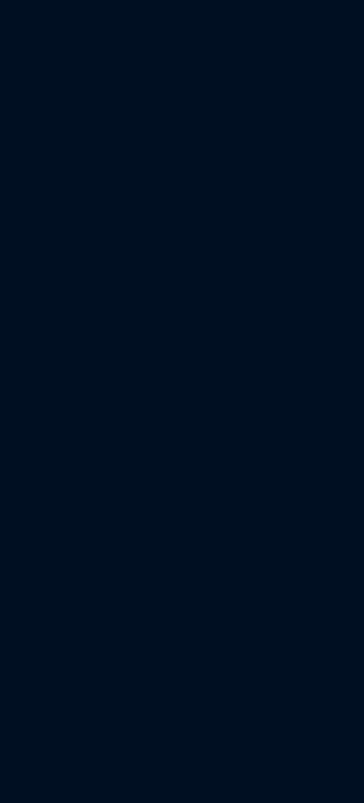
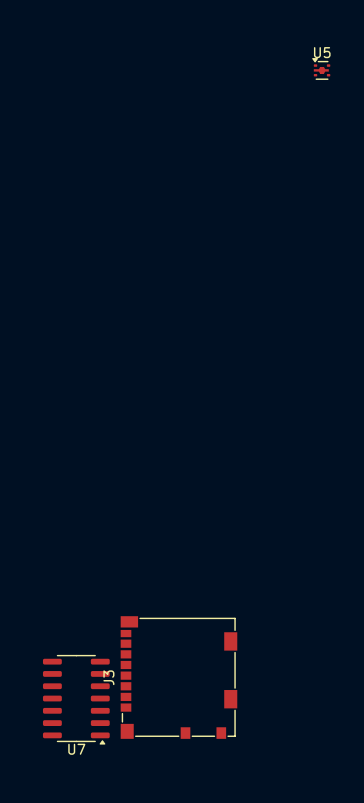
U5: none -> (321, 68)
J3: none -> (178, 677)
U7: none -> (76, 699)

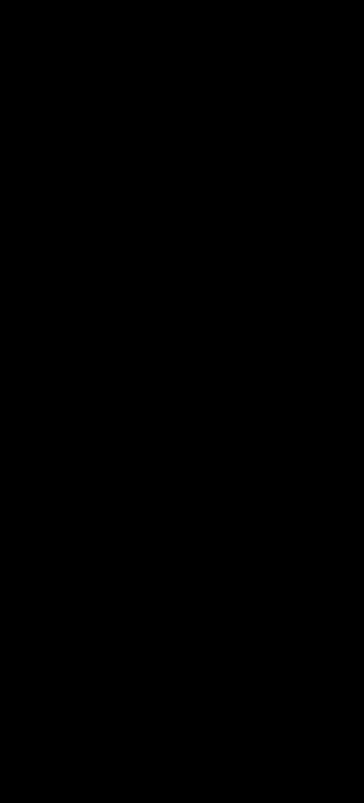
U5: (321, 68) -> none
J3: (178, 677) -> none
U7: (76, 699) -> none

